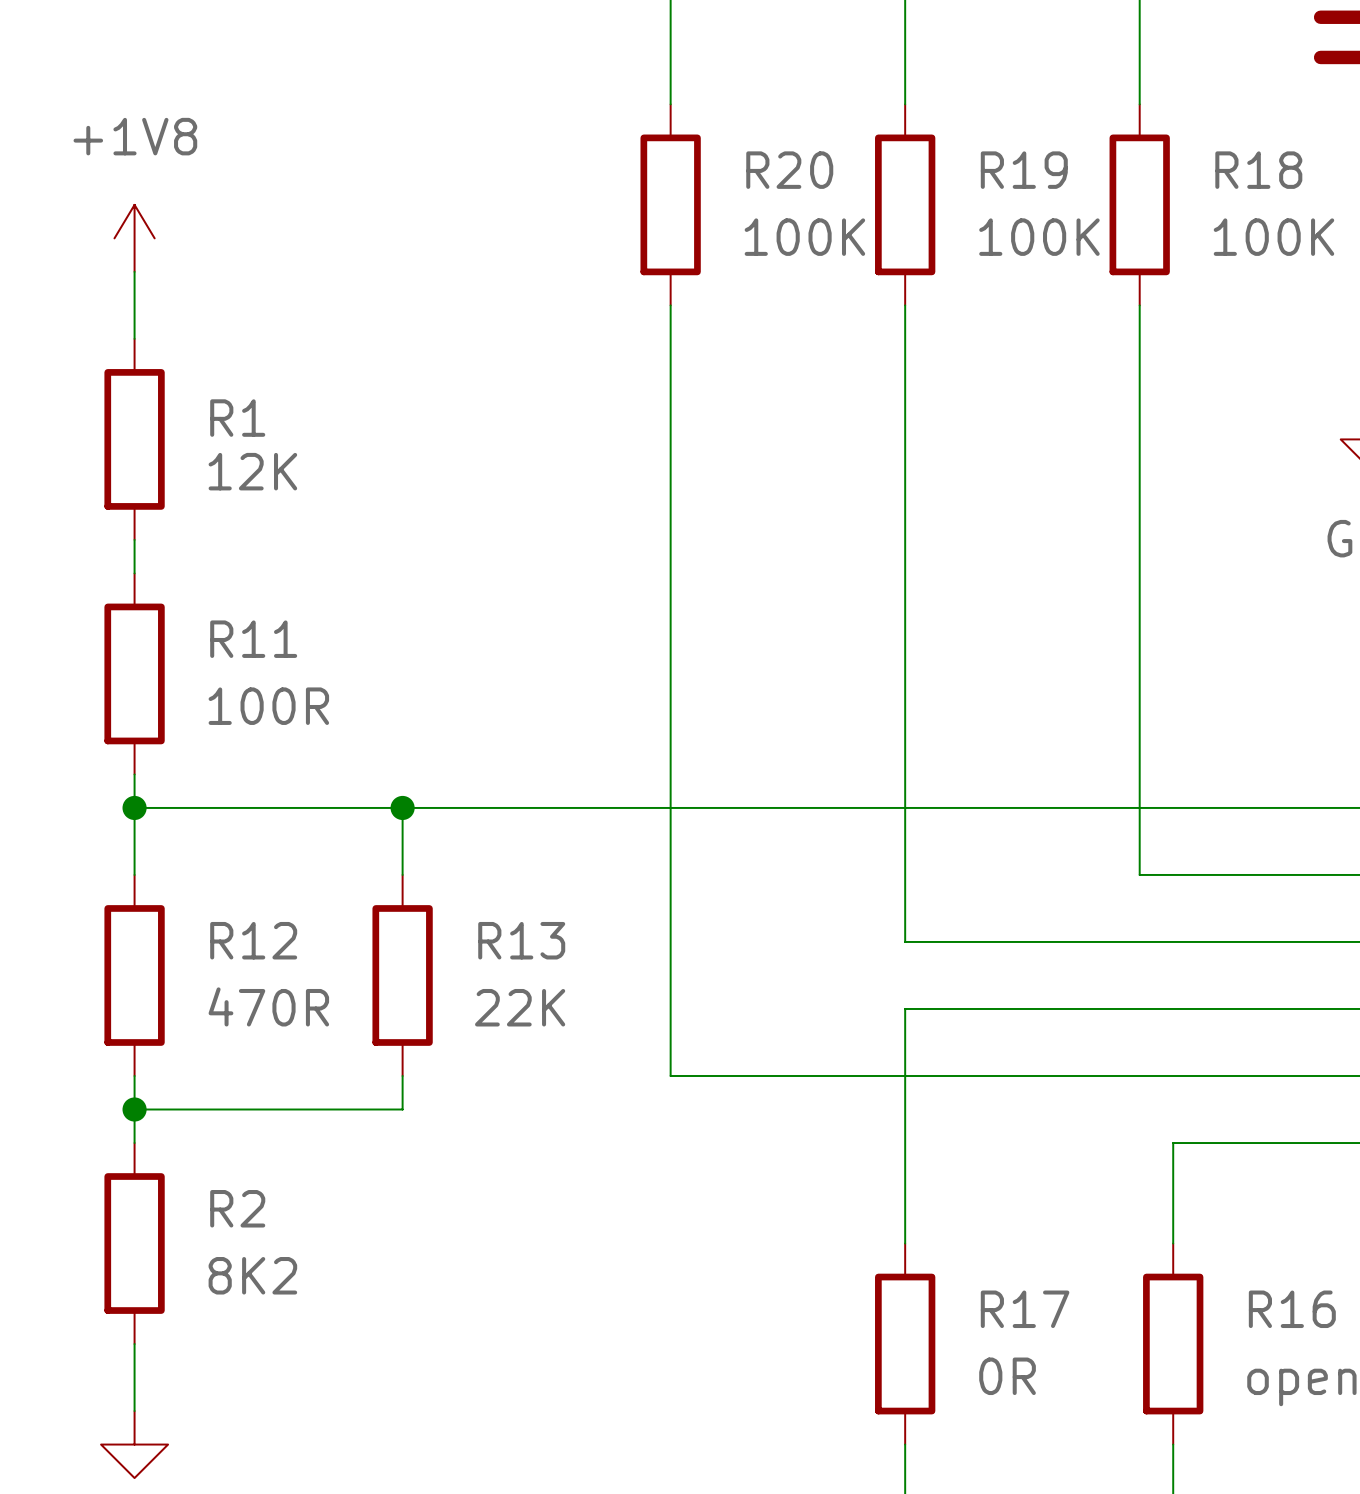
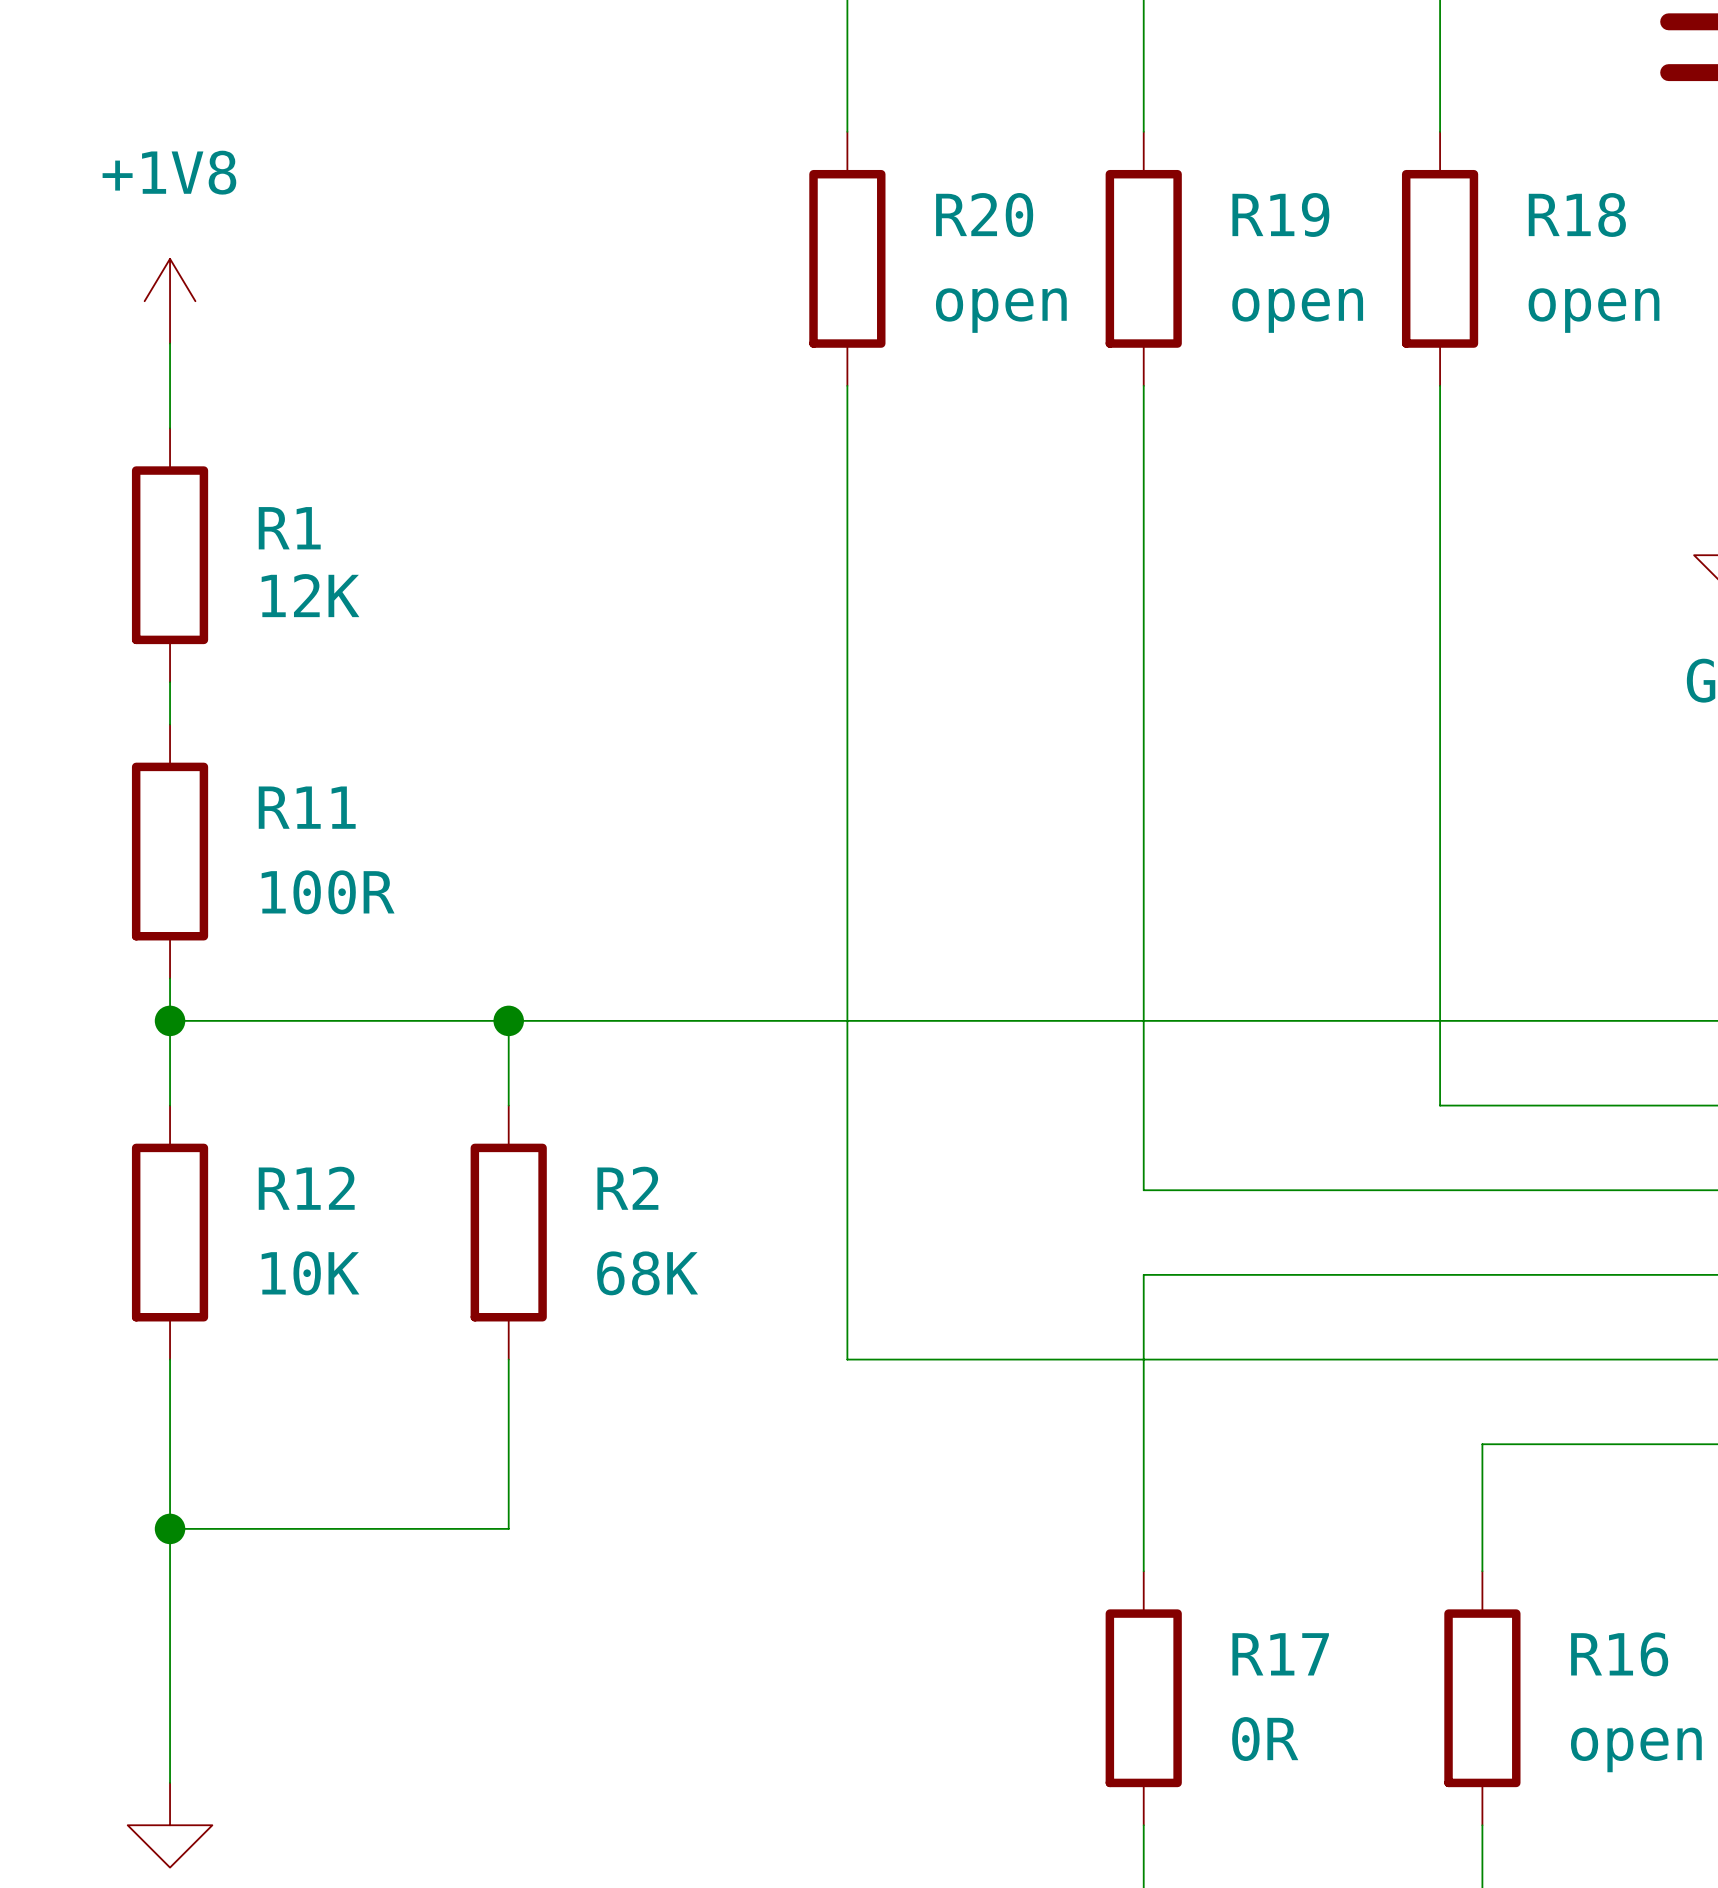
R20 value: 100K (804, 237) -> open (1001, 310)
R19 value: 100K (1039, 237) -> open (1297, 310)
R18 value: 100K (1273, 237) -> open (1594, 310)
R13 name: R13 (521, 940) -> R2 (627, 1188)
R12 value: 470R (268, 1006) -> 10K (310, 1273)
R13 value: 22K (520, 1007) -> 68K (647, 1273)
wire: (134, 1109) (402, 1109) -> (170, 1528) (508, 1528) (508, 1401)
junction position: (134, 1109) -> (170, 1528)
wire: none -> (170, 1444) (170, 1698)
R2: 8K2 (134, 1243) -> none

